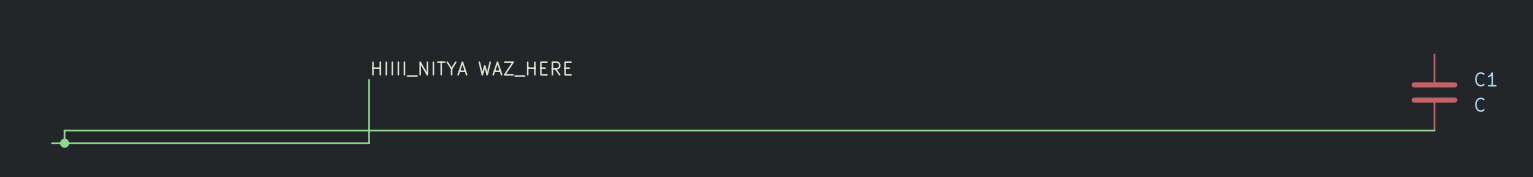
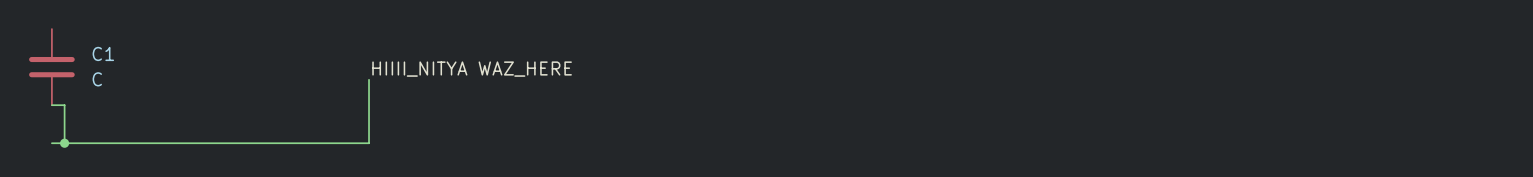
C1 position: (1434, 92) -> (51, 67)
wire: (64, 130) (1434, 130) -> (64, 130) (64, 105) (51, 105)

